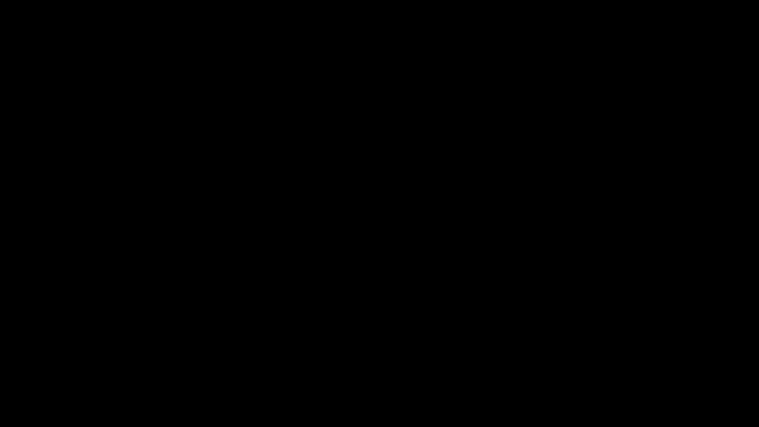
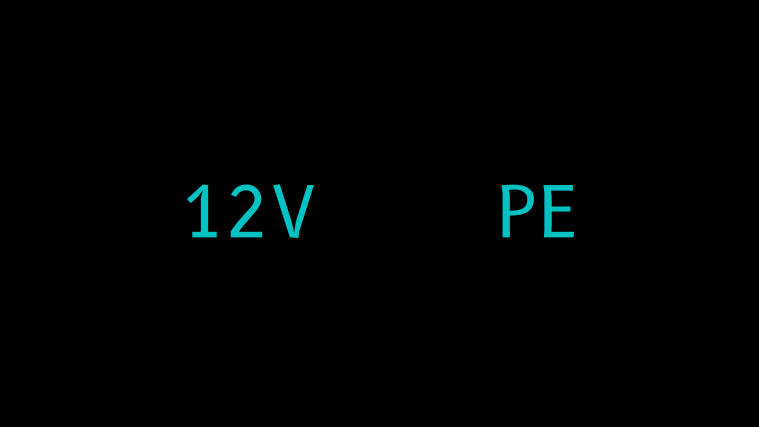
text: none -> 12V (250, 211)
text: none -> PE (537, 210)

